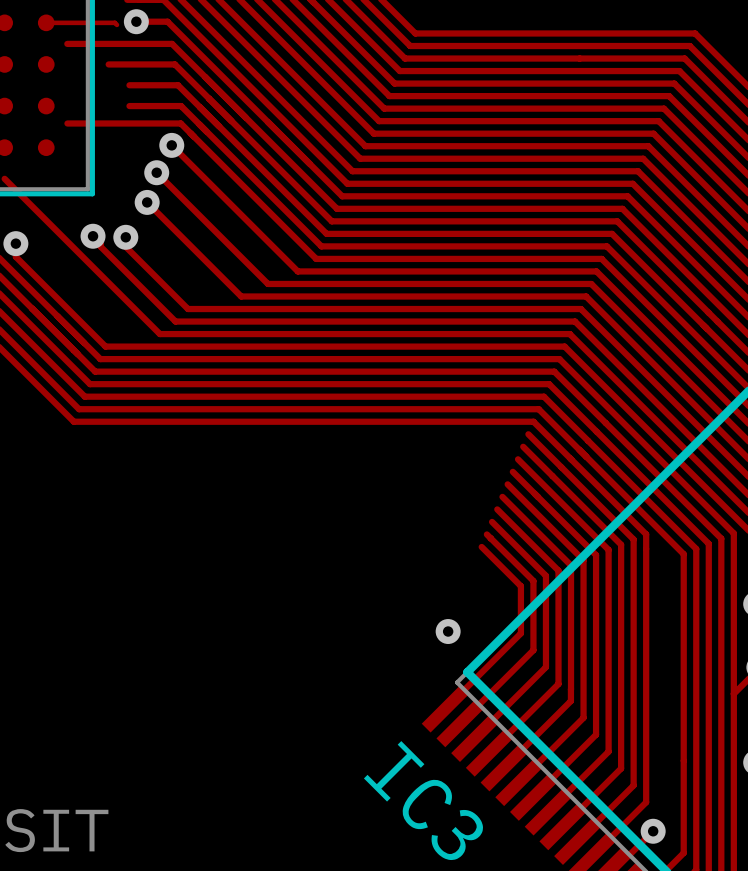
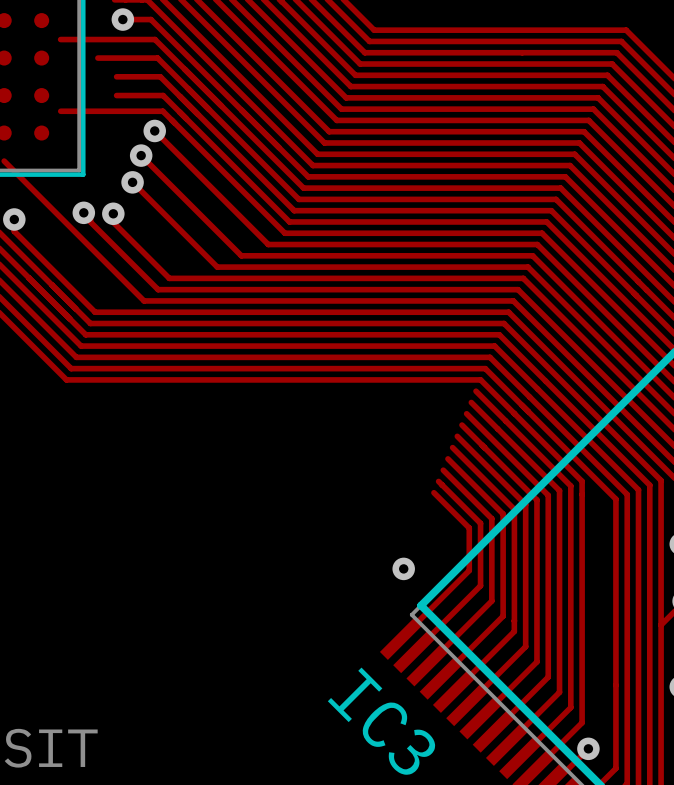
track: (46, 22) (114, 22) (116, 24) -> none

